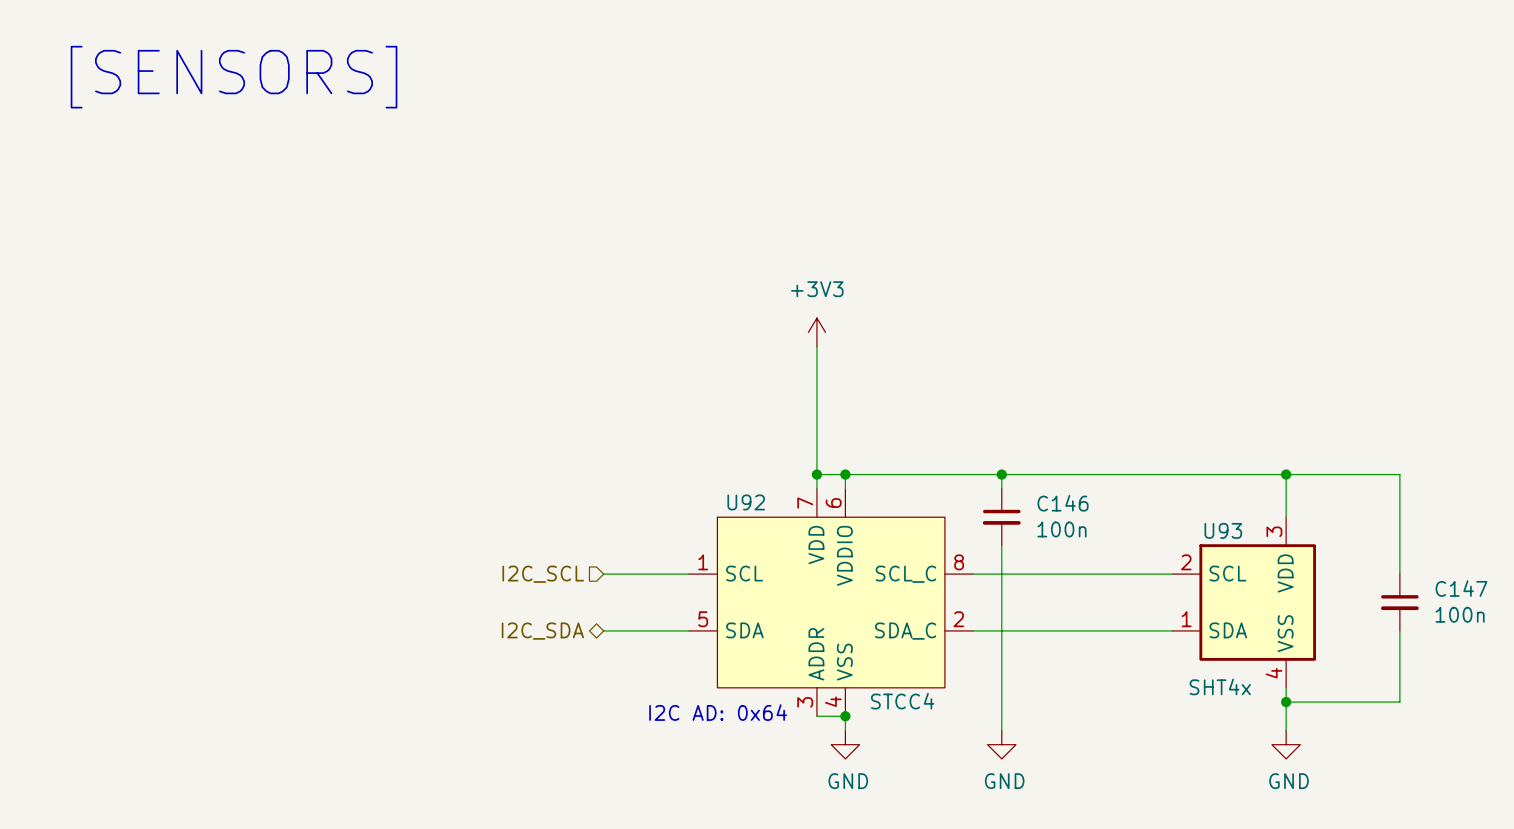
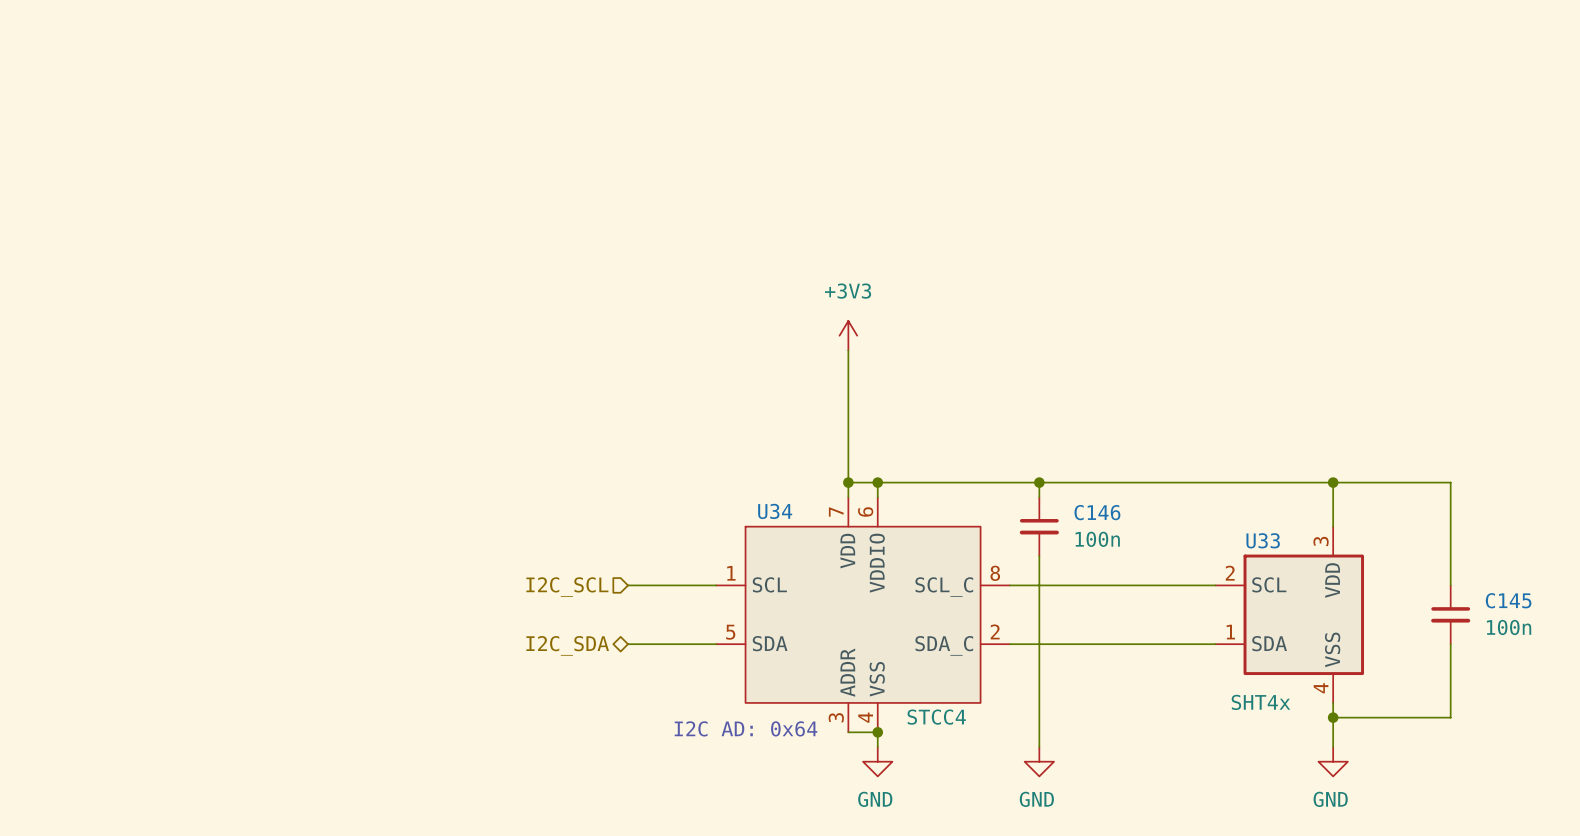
text: [SENSORS] (234, 77) -> none
U92 name: U92 (746, 502) -> U34 (775, 511)
U93 name: U93 (1223, 530) -> U33 (1263, 540)
C147 name: C147 (1461, 588) -> C145 (1508, 600)

